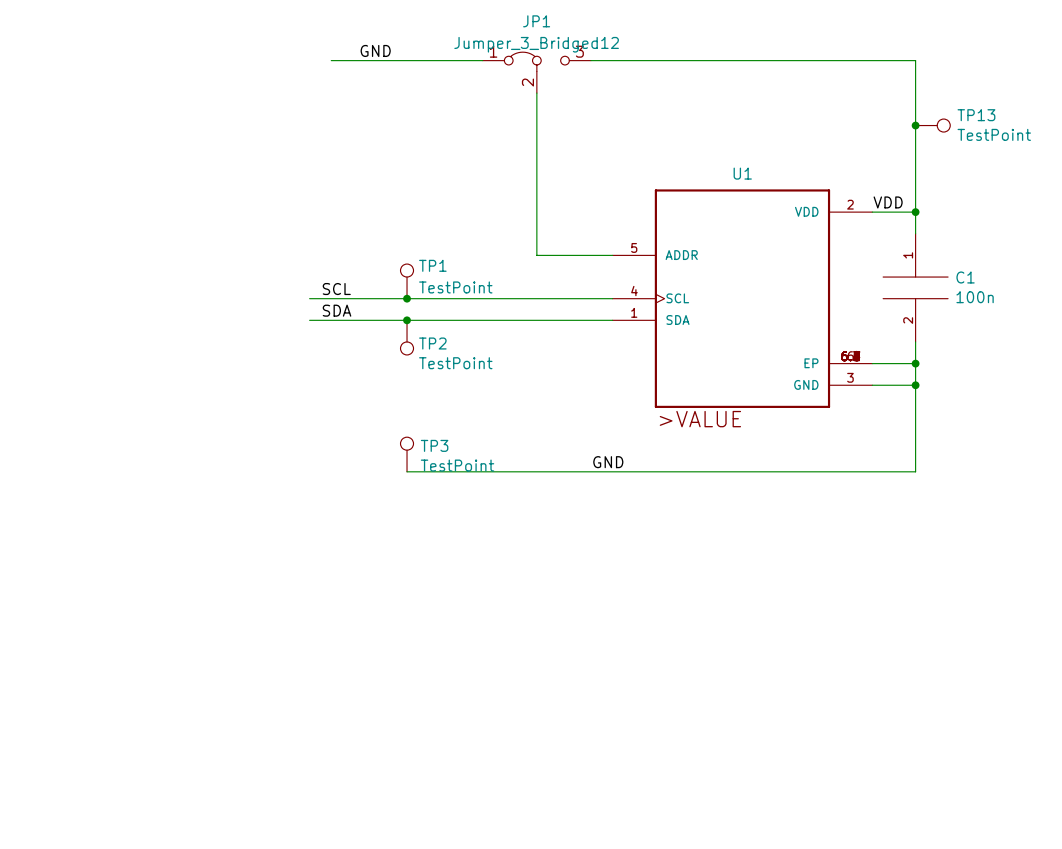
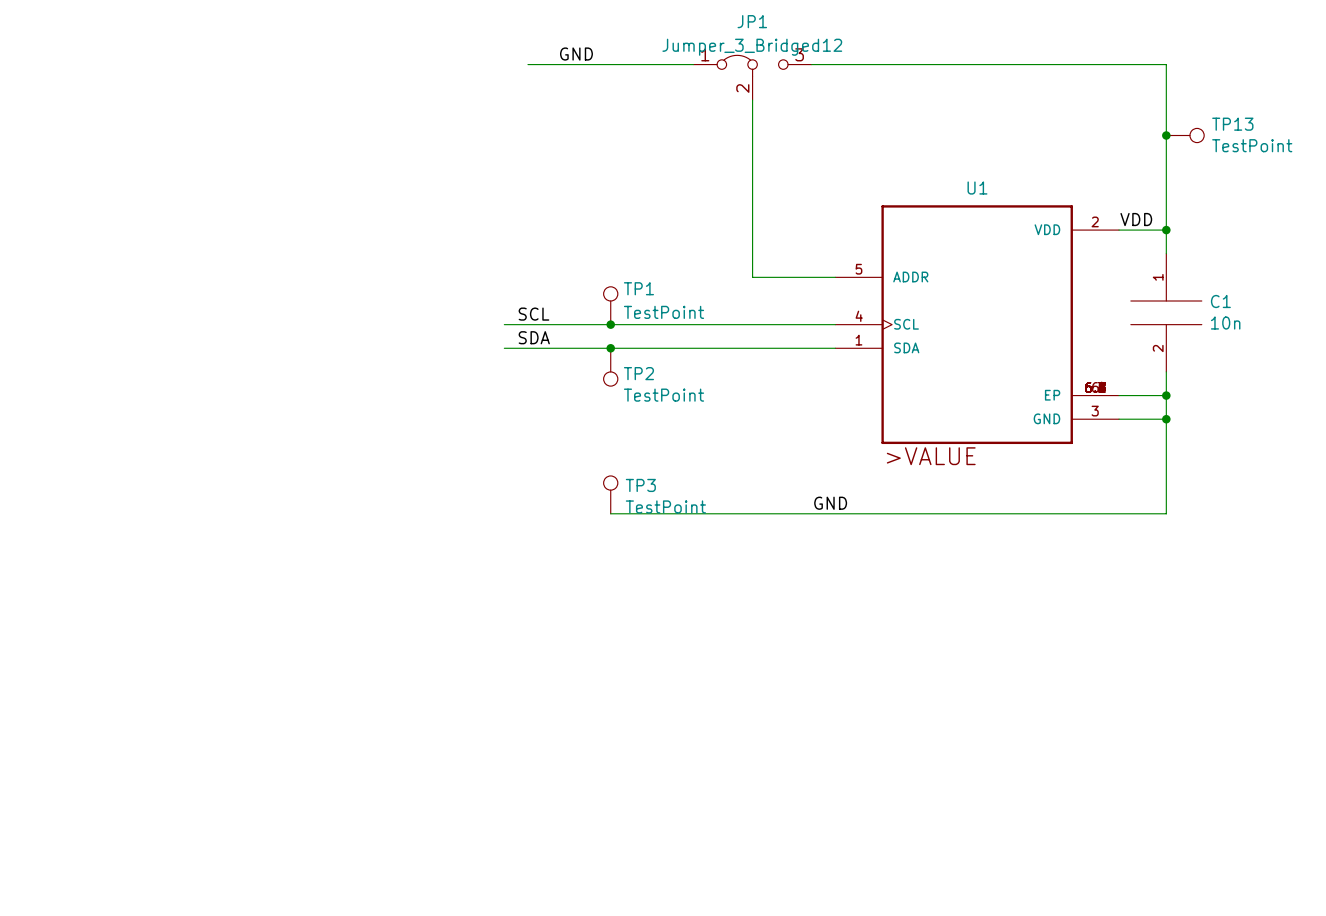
C1 value: 100n (975, 297) -> 10n (1225, 323)

